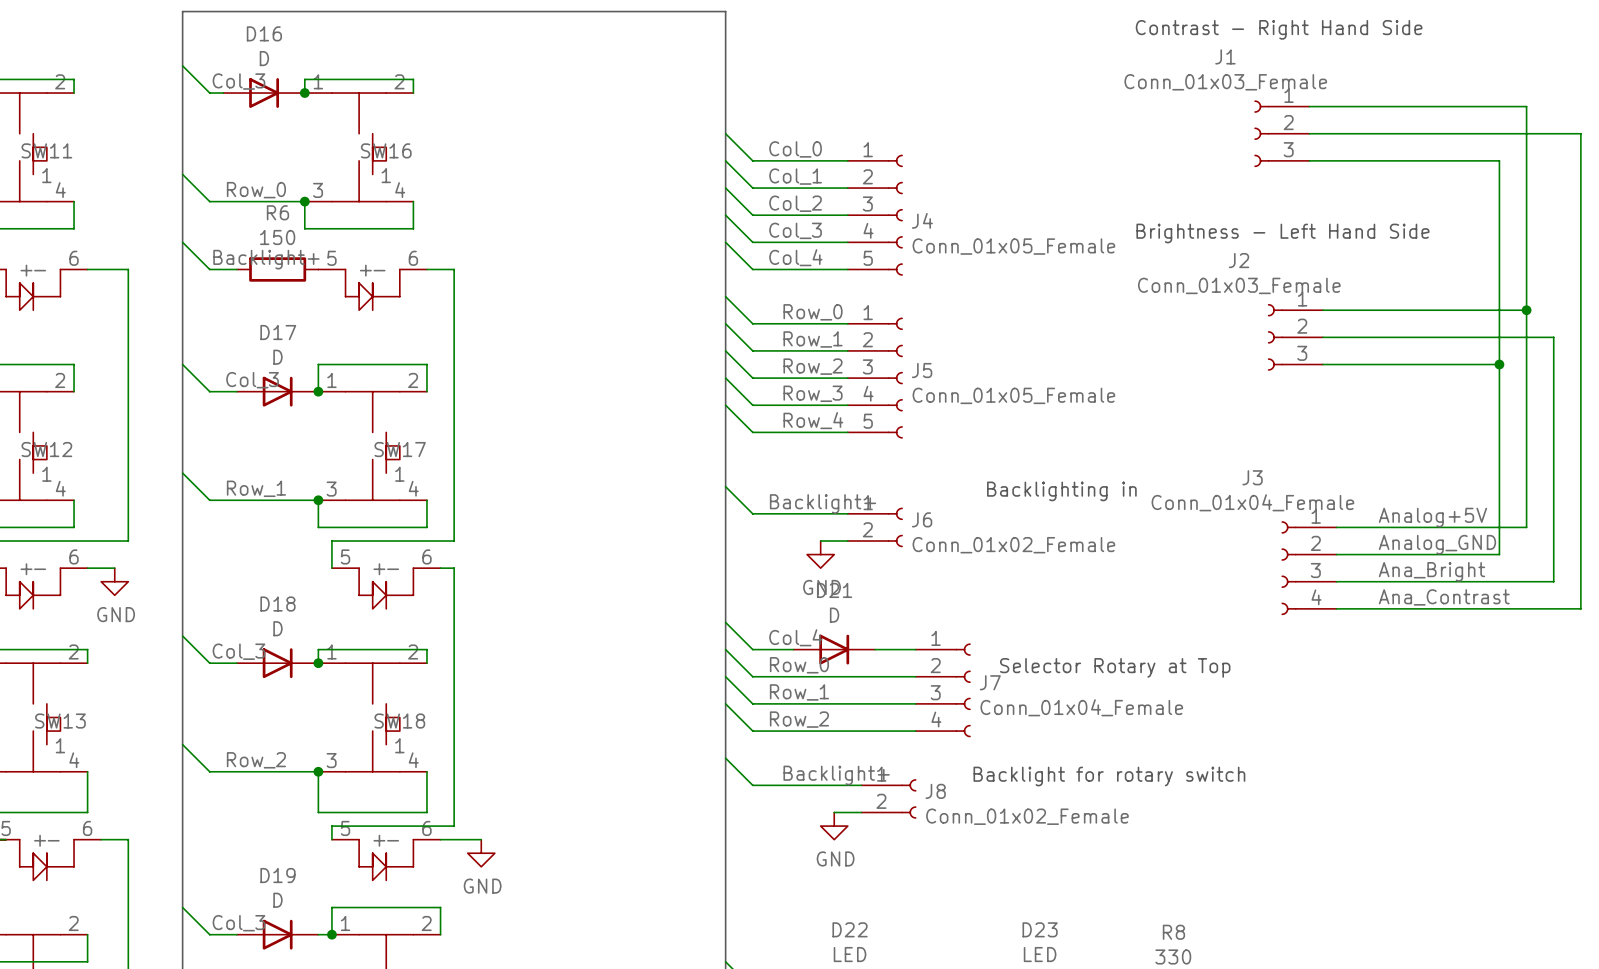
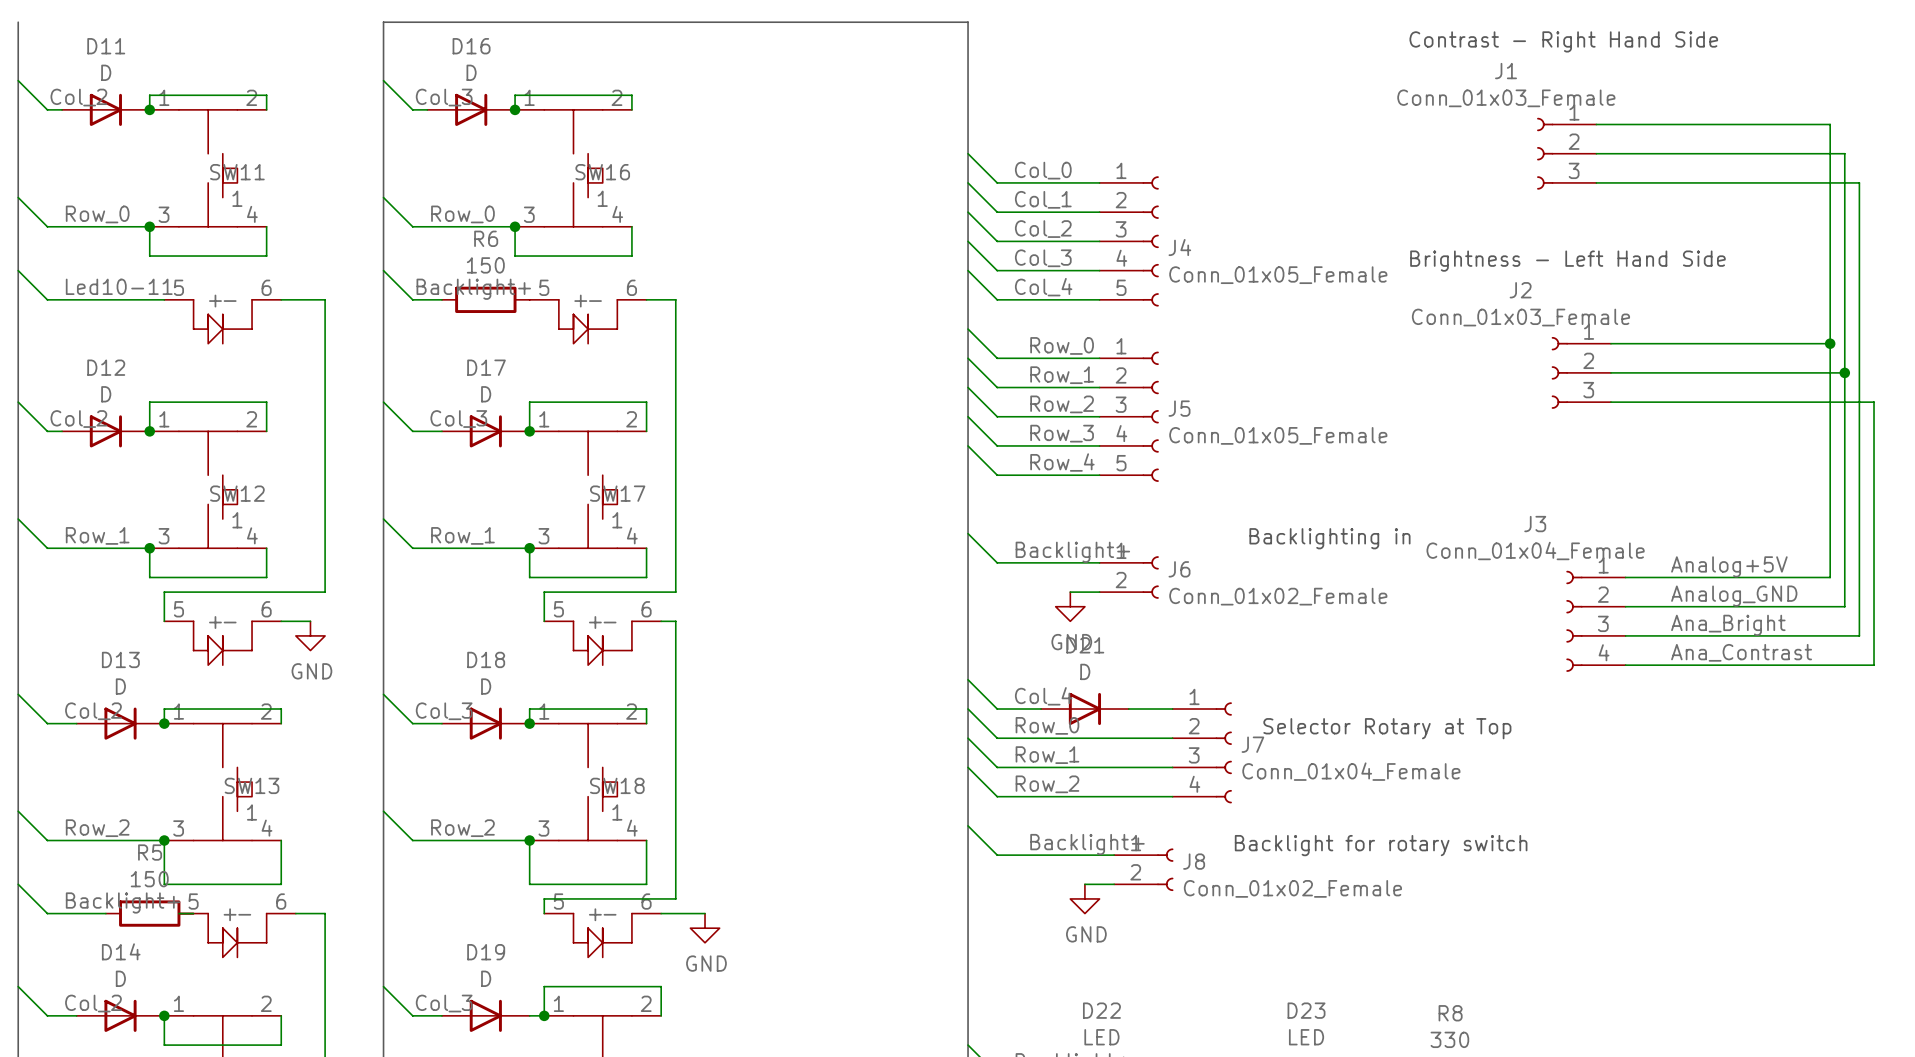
wire: (1540, 133) (1580, 133) (1580, 608) (1567, 608) -> (1800, 402) (1874, 402) (1874, 665)
wire: (1499, 160) (1499, 554) -> (1844, 153) (1844, 606) (1800, 606)
wire: (1540, 337) (1553, 337) -> (1800, 182) (1859, 182) (1859, 372)
junction position: (1499, 364) -> (1844, 372)

